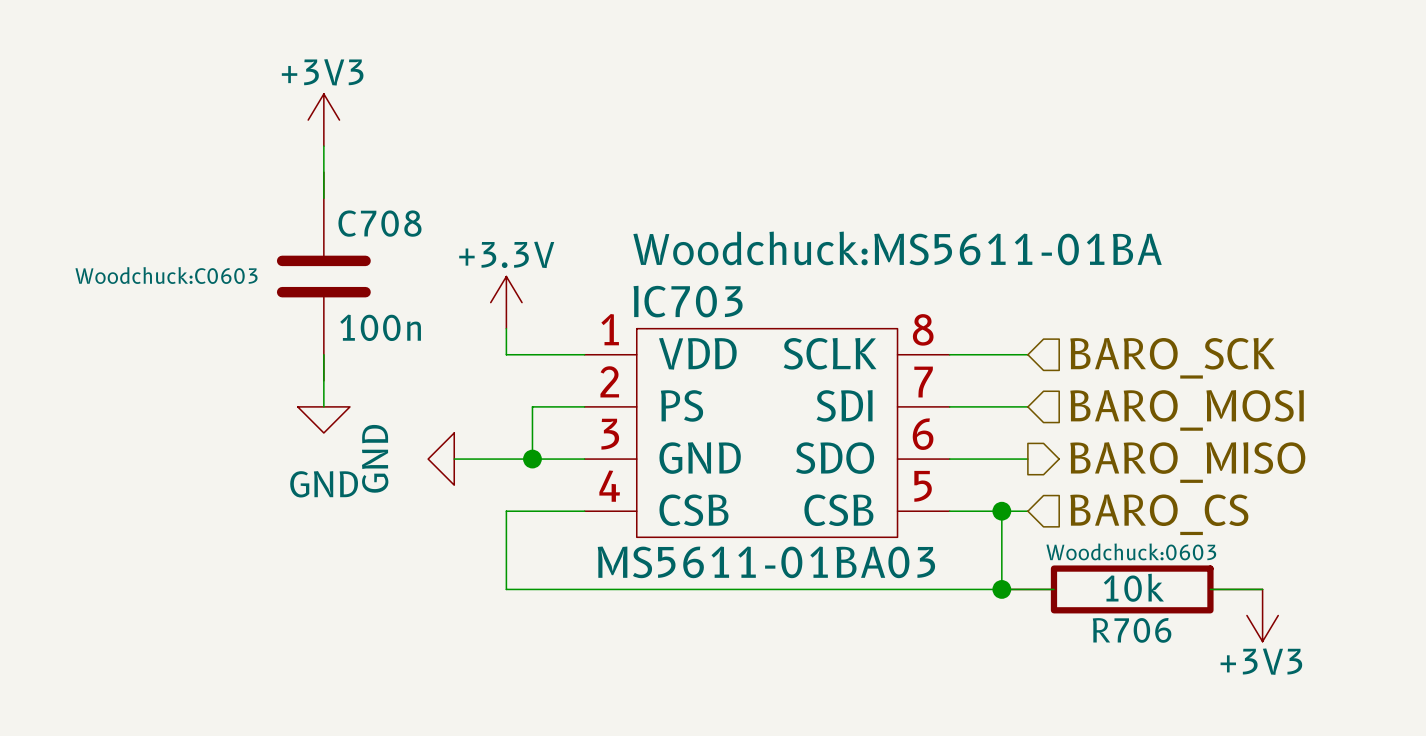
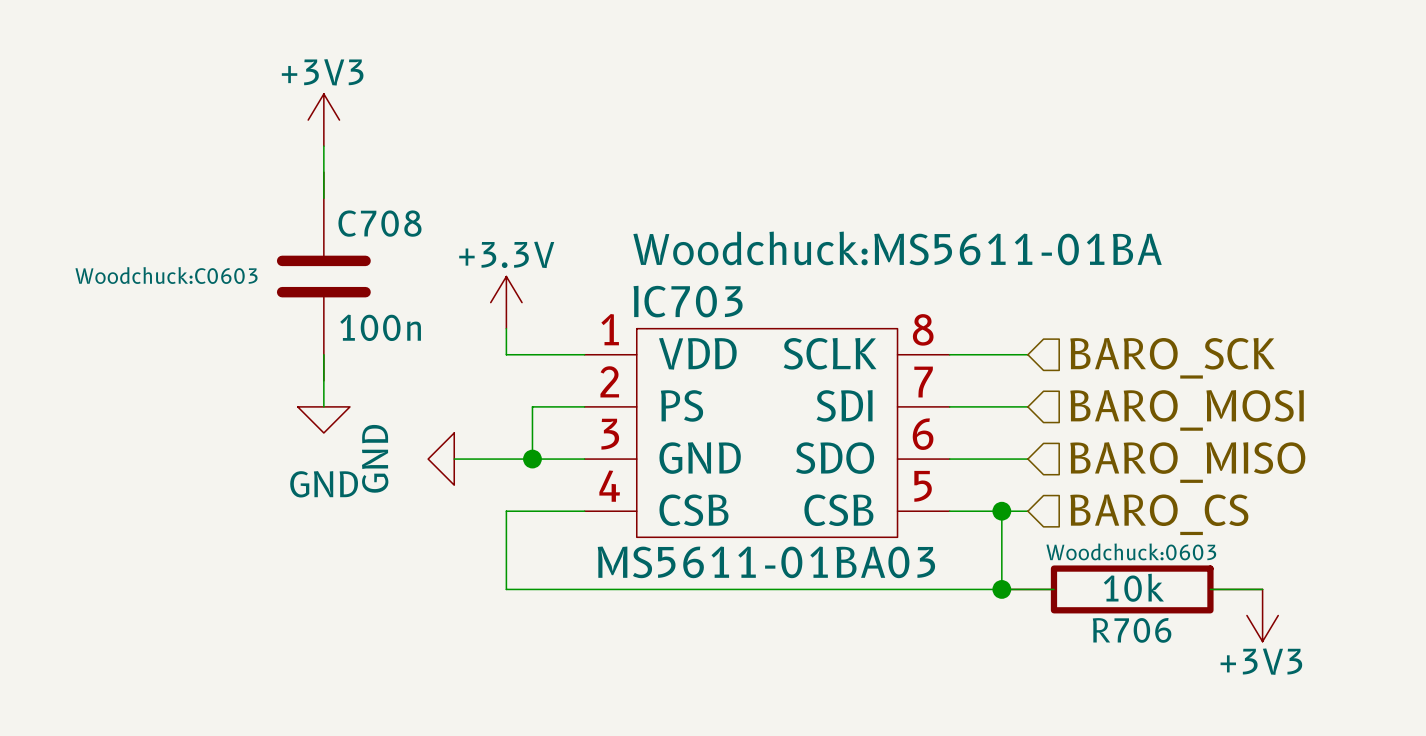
hierarchical label shape: output (1187, 462) -> input (1187, 462)

